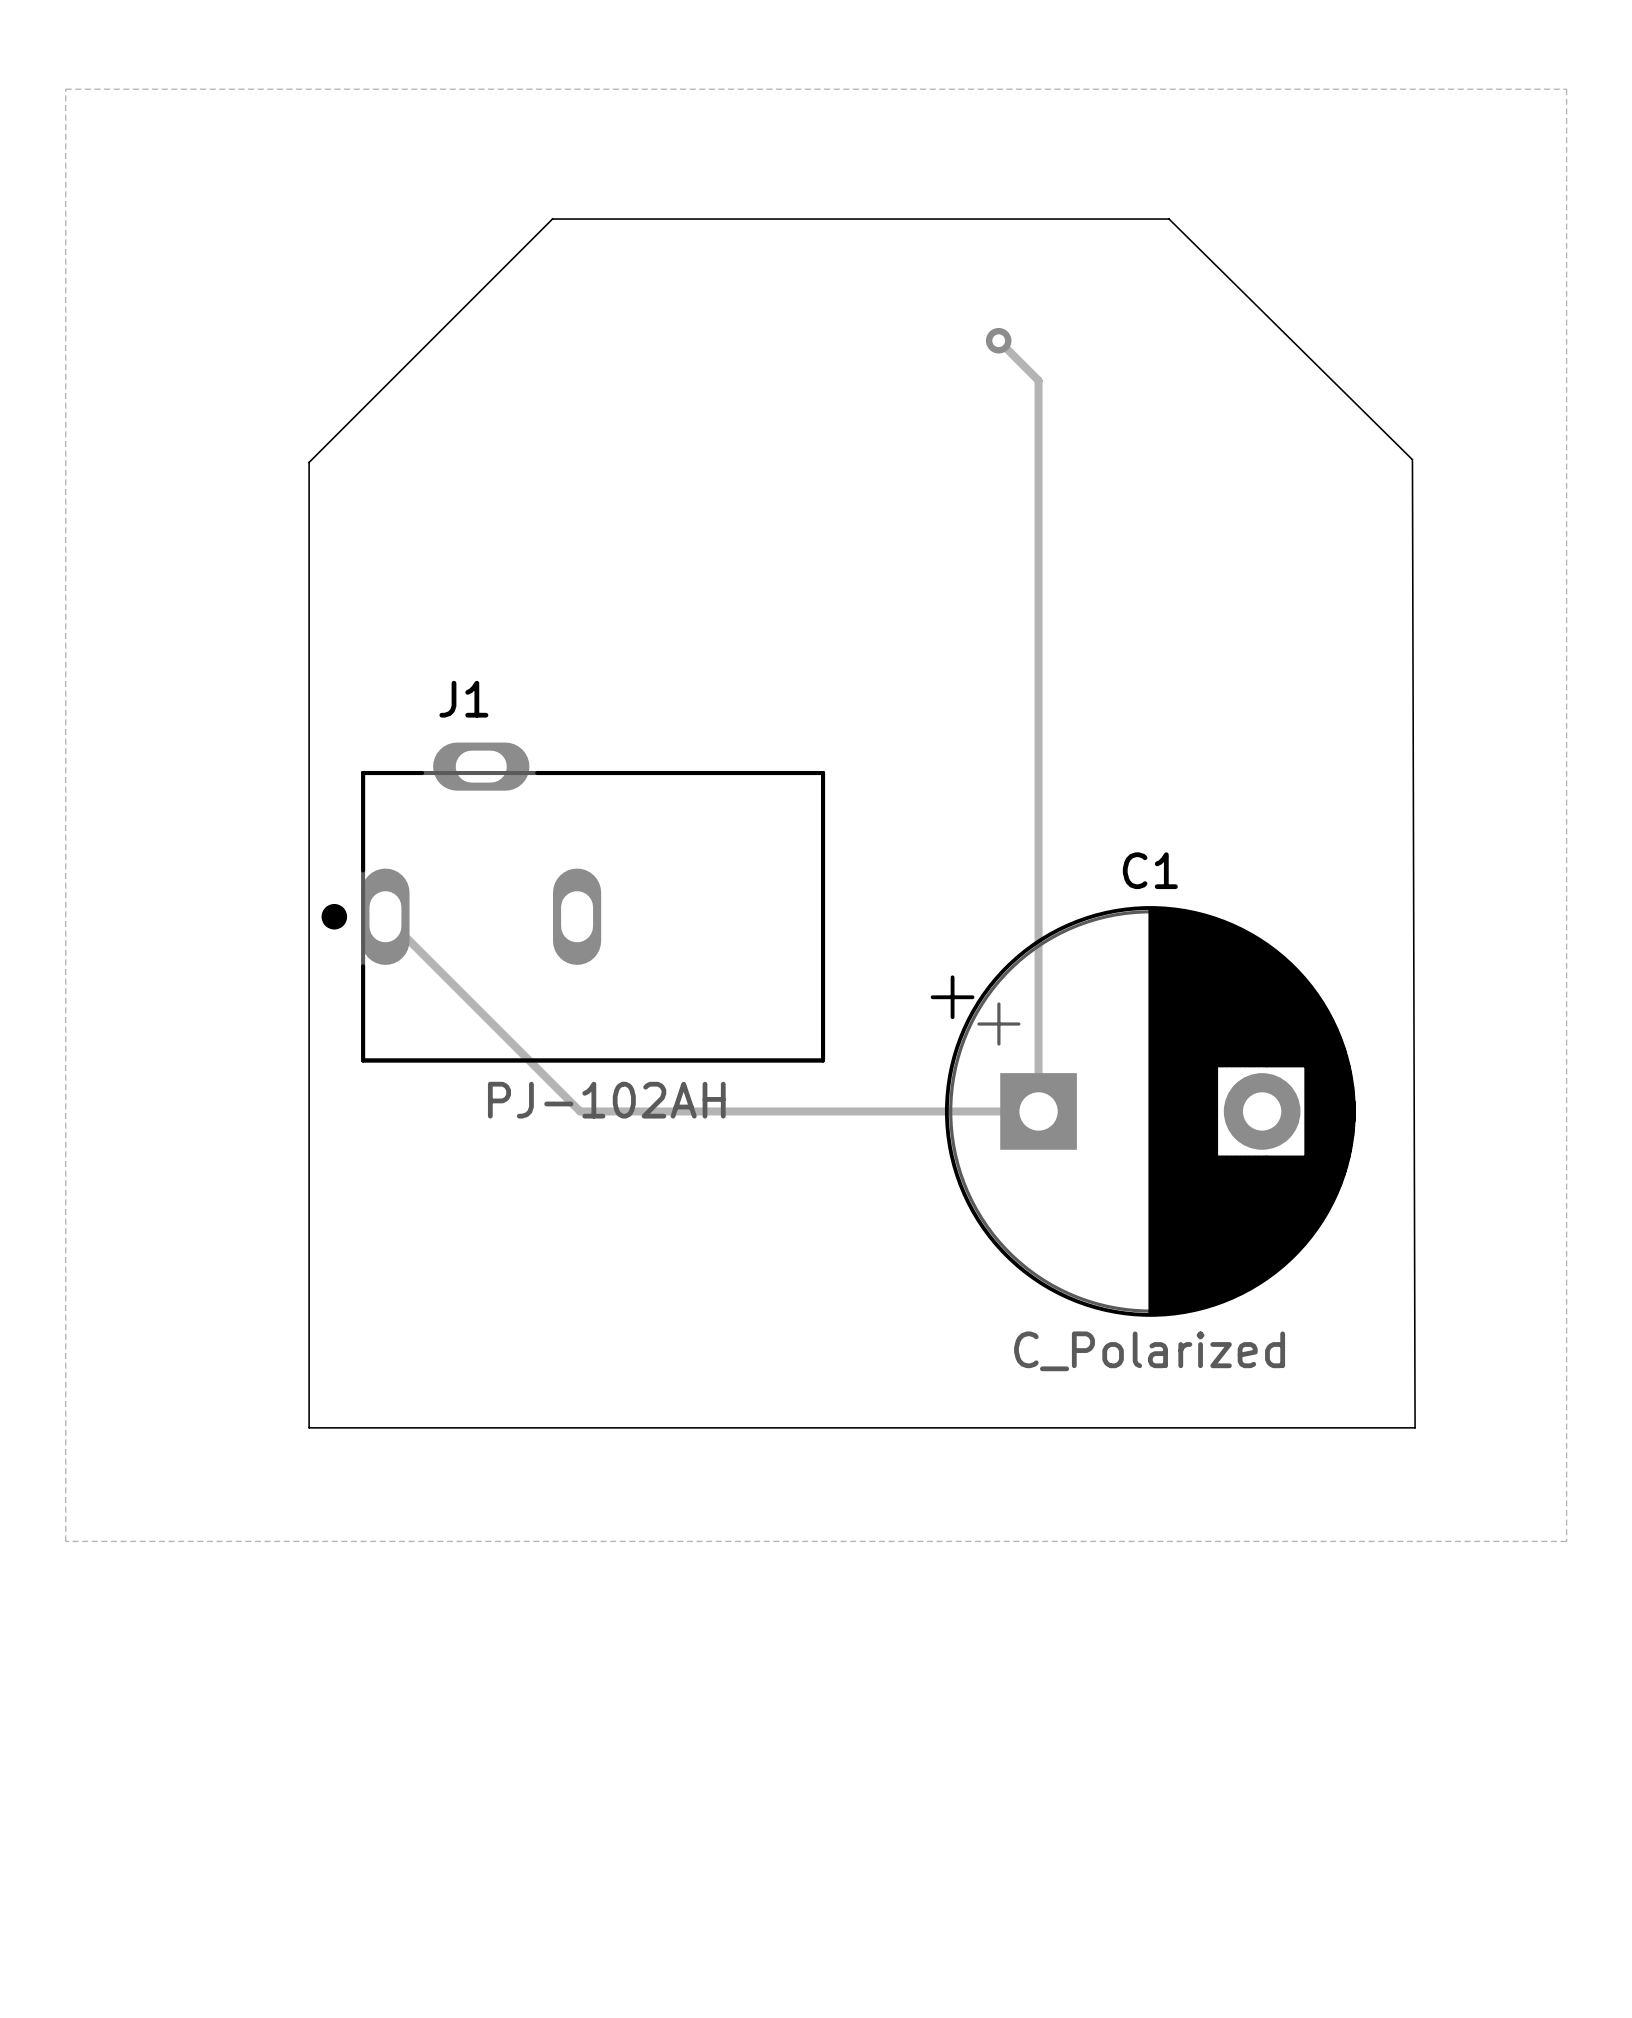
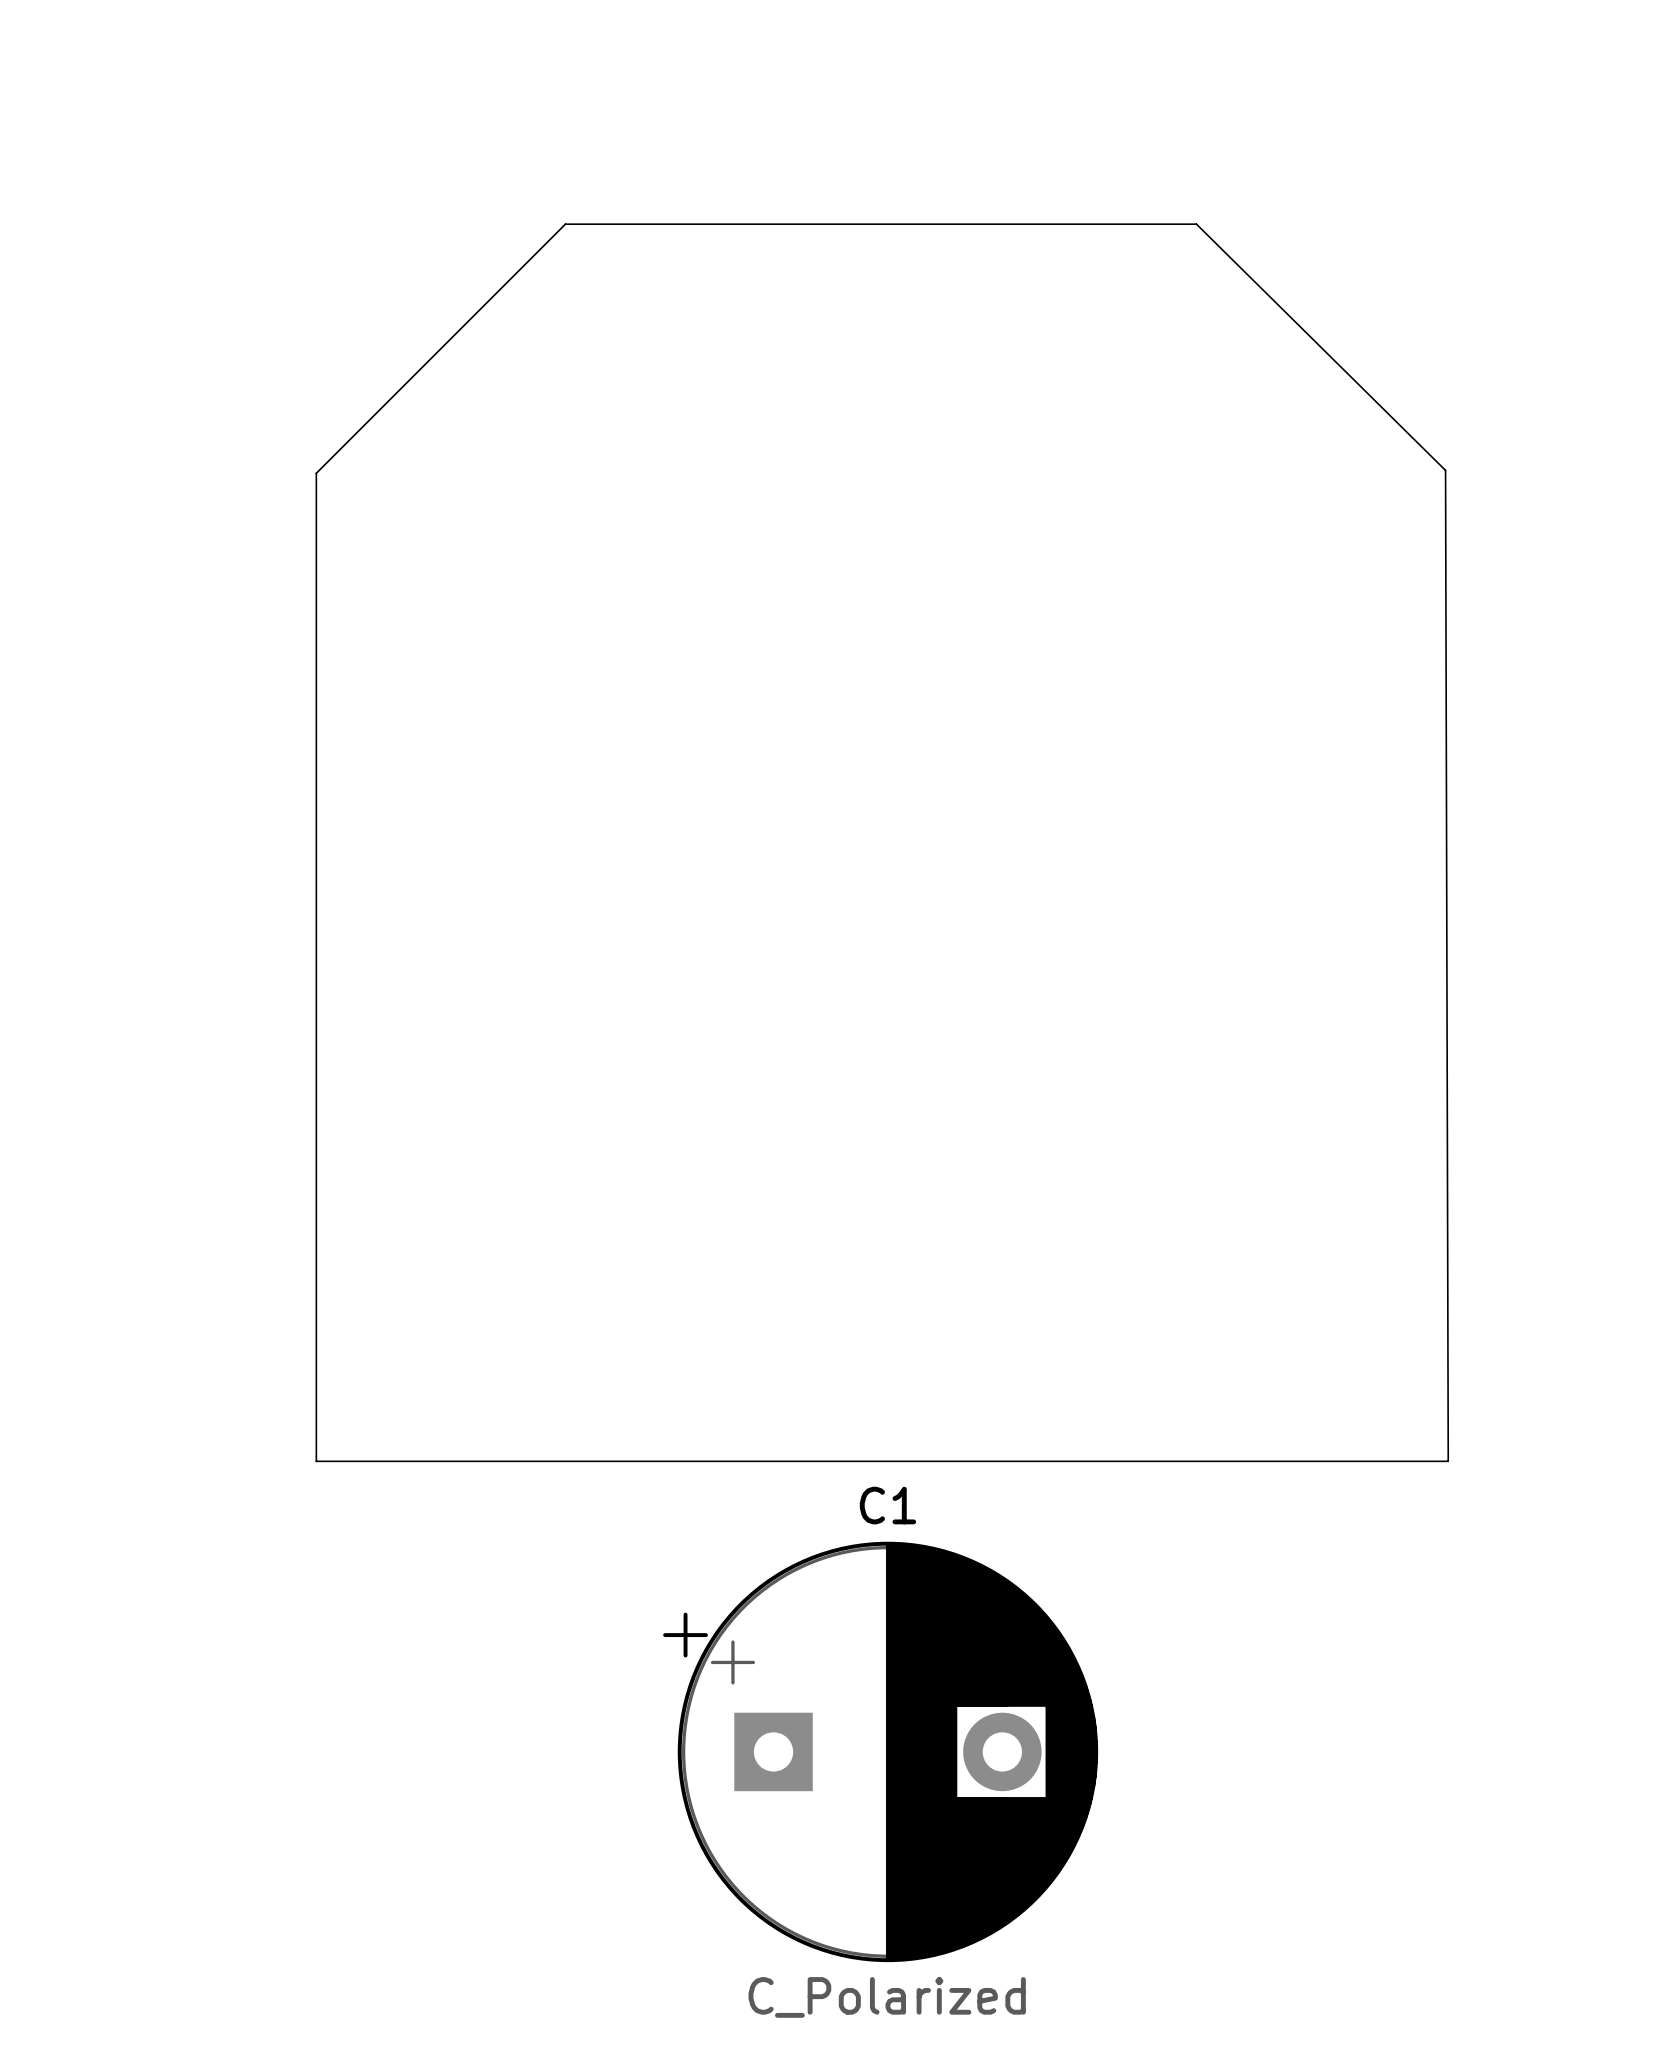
zone outline: (65, 89) (65, 1541) (1566, 1541) (1566, 89) (65, 89) -> none
track: (998, 340) (1038, 380) (1038, 1111) (580, 1111) (385, 916) -> none
via: (998, 340) -> none
J1: PJ-102AH (573, 902) -> none
C1 position: (1143, 1111) -> (880, 1751)

